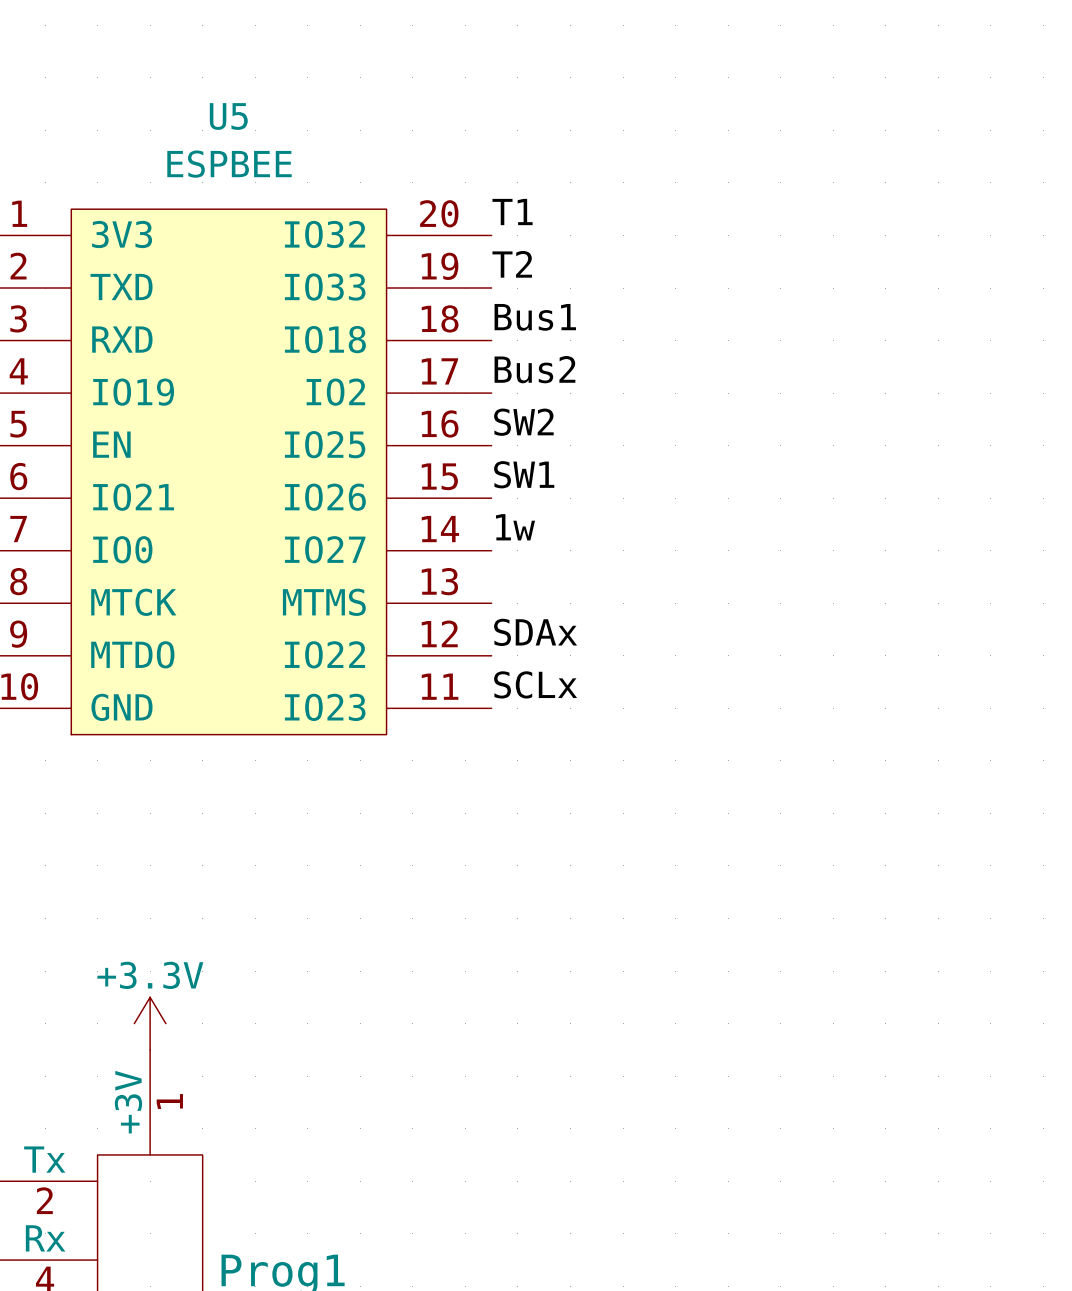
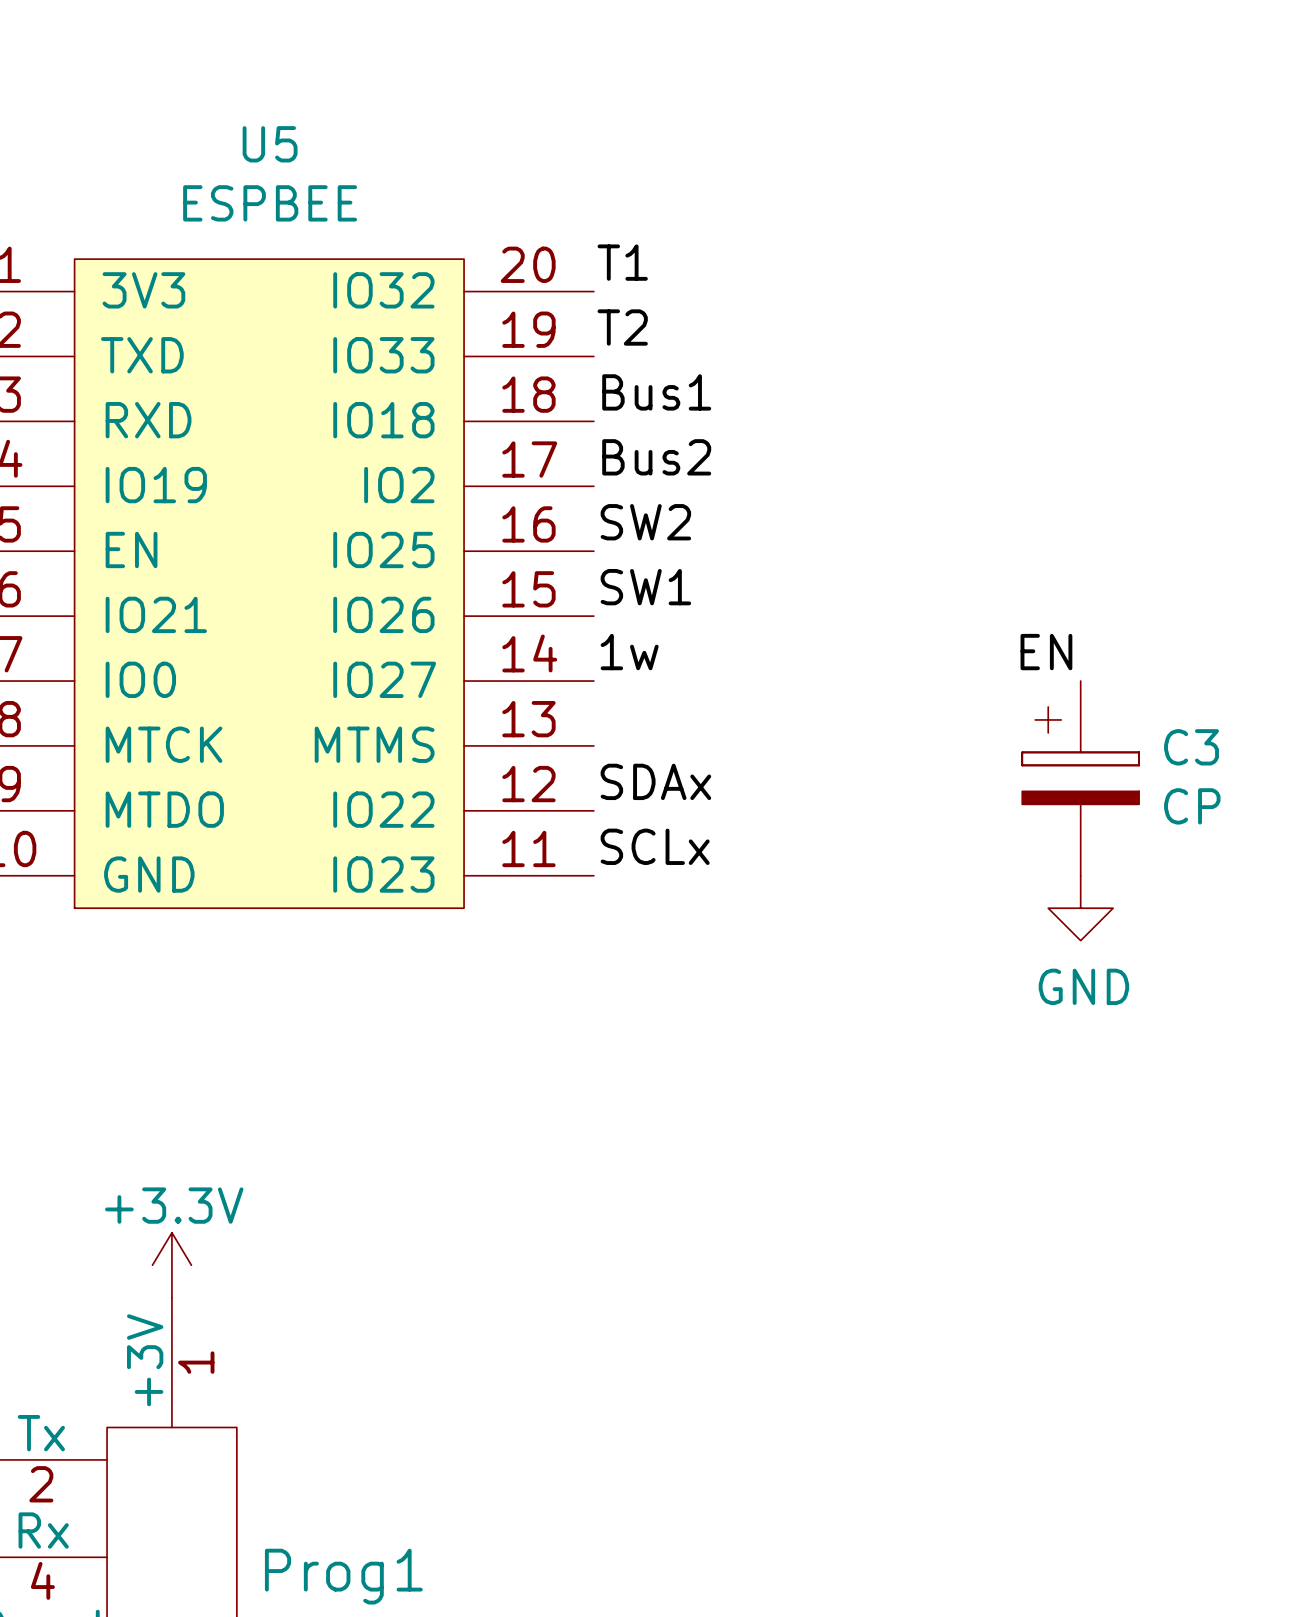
label: none -> EN (1046, 652)
C3: none -> CP (1080, 778)
power symbol: none -> GND (1080, 908)

